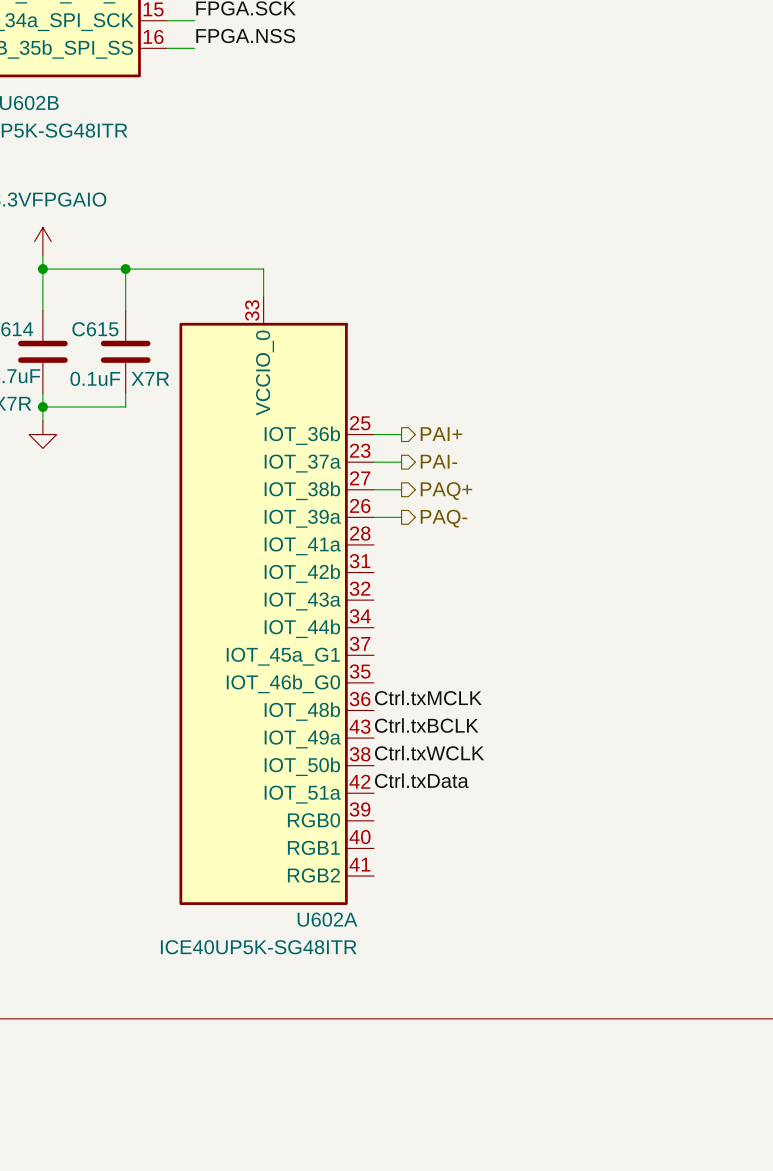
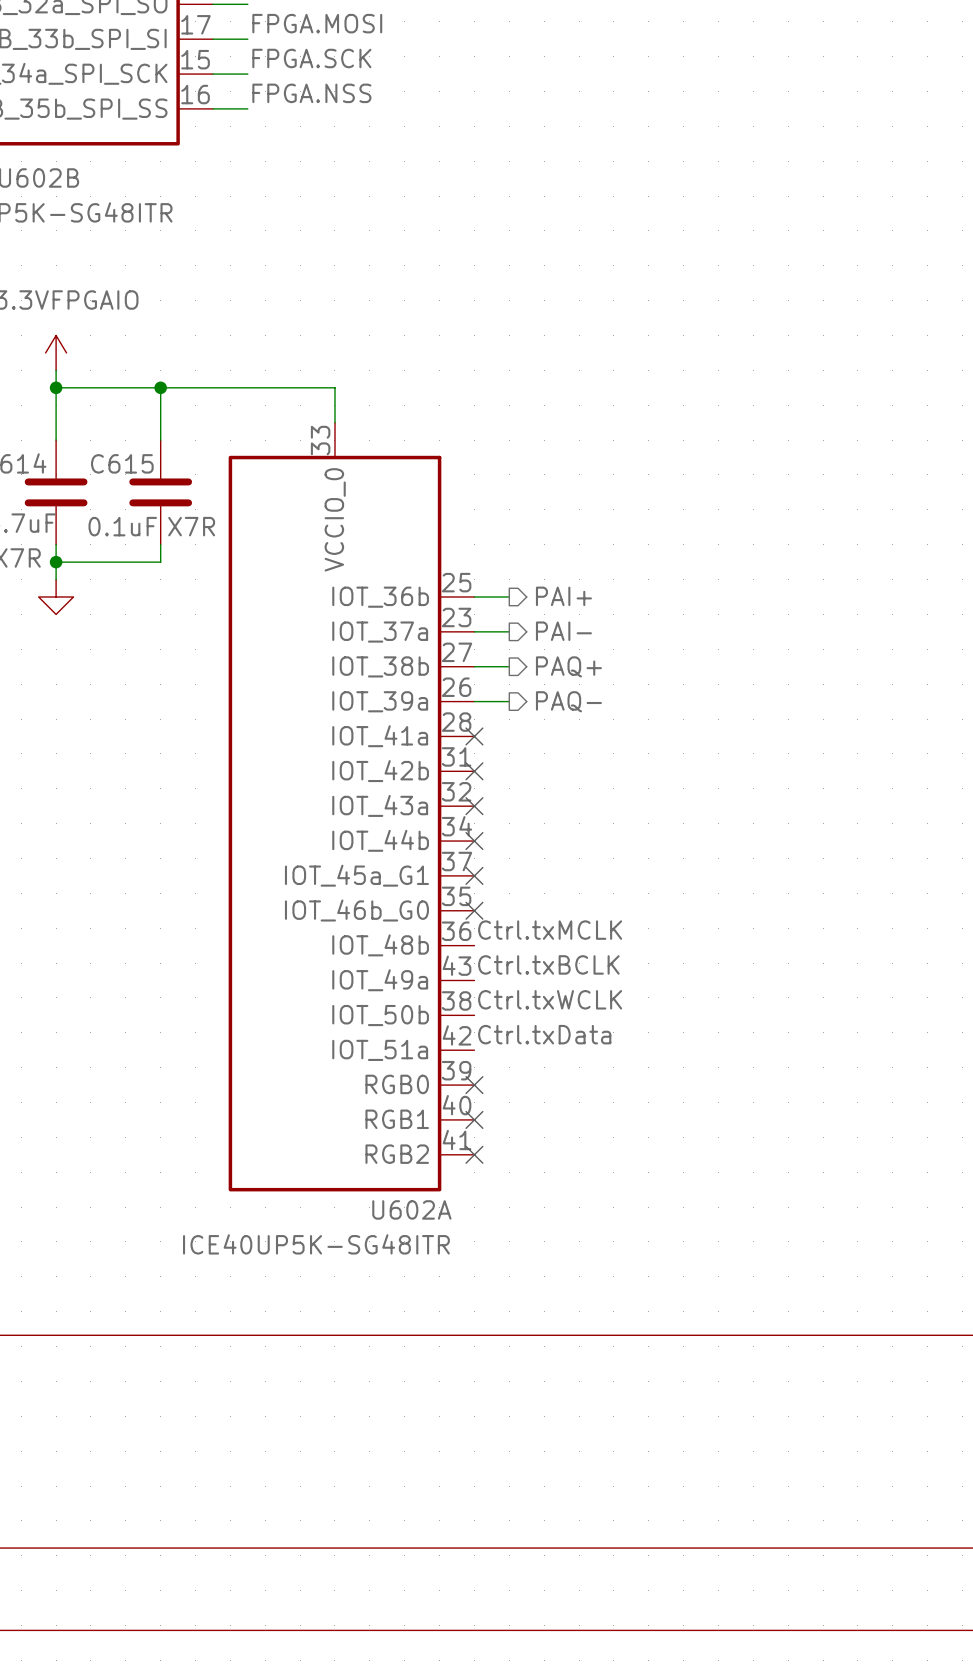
no-connect mark: none -> (474, 736)
no-connect mark: none -> (474, 771)
no-connect mark: none -> (474, 806)
no-connect mark: none -> (474, 841)
no-connect mark: none -> (474, 875)
no-connect mark: none -> (474, 910)
no-connect mark: none -> (474, 1085)
no-connect mark: none -> (474, 1119)
no-connect mark: none -> (474, 1154)

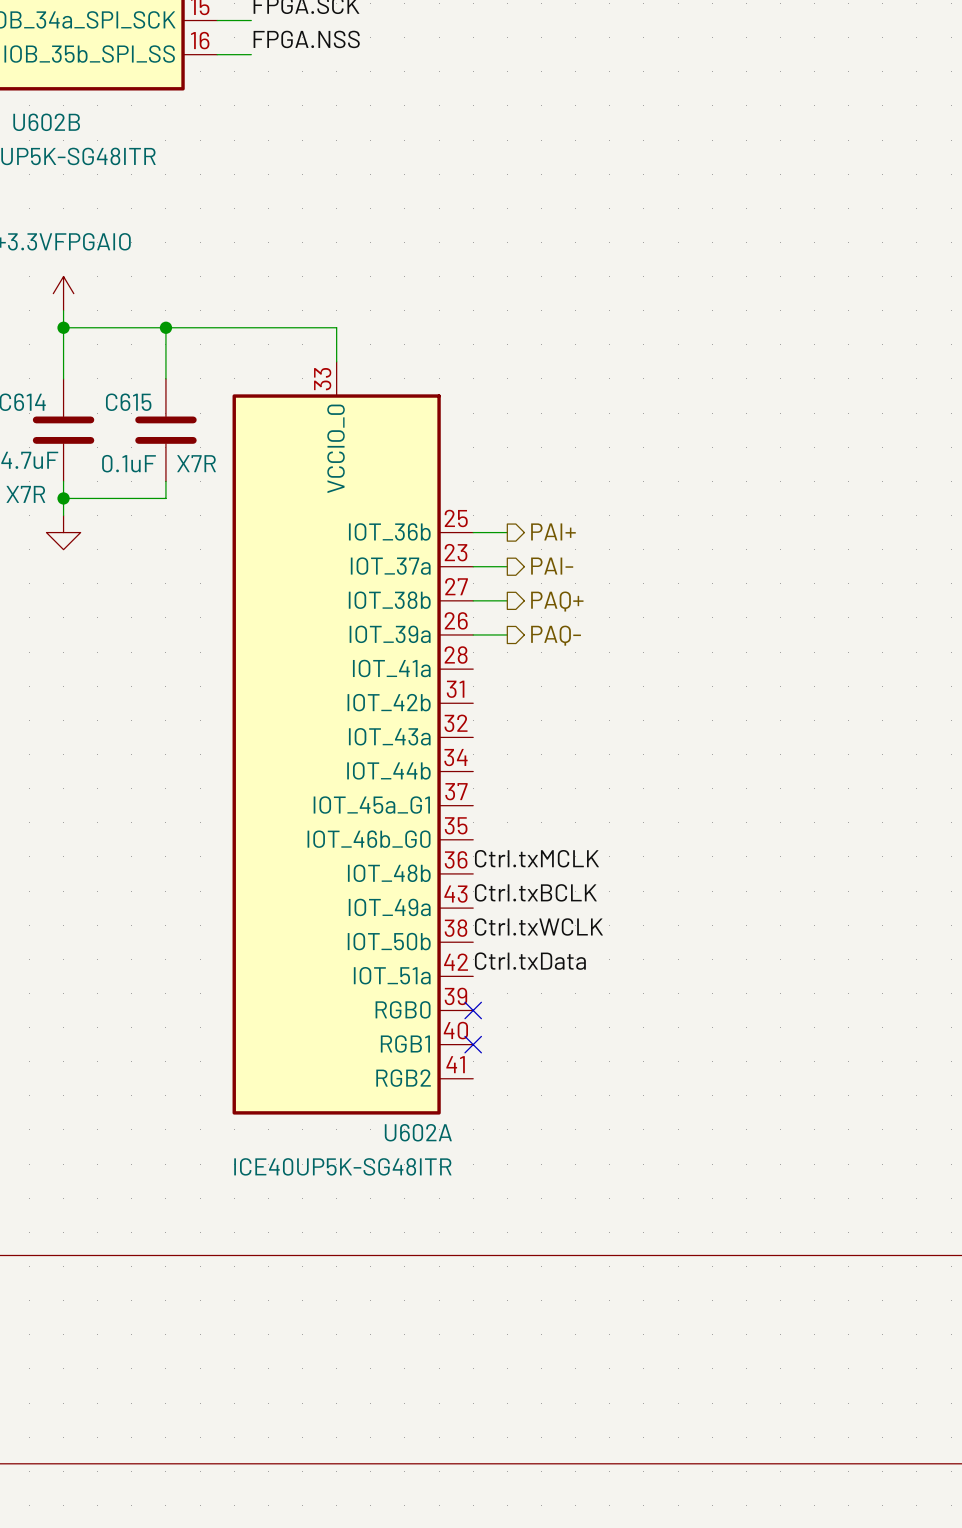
no-connect mark: (474, 736) -> none
no-connect mark: (474, 771) -> none
no-connect mark: (474, 806) -> none
no-connect mark: (474, 841) -> none
no-connect mark: (474, 875) -> none
no-connect mark: (474, 910) -> none
no-connect mark: (474, 1154) -> none

